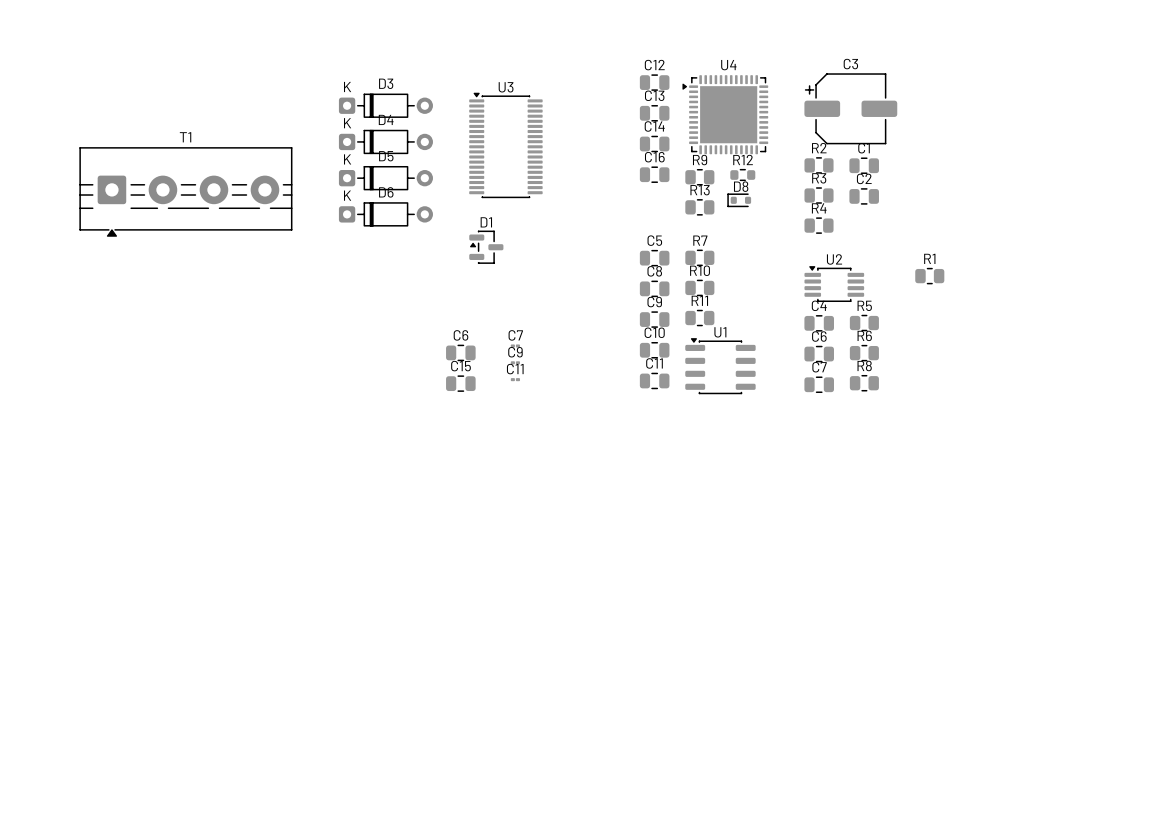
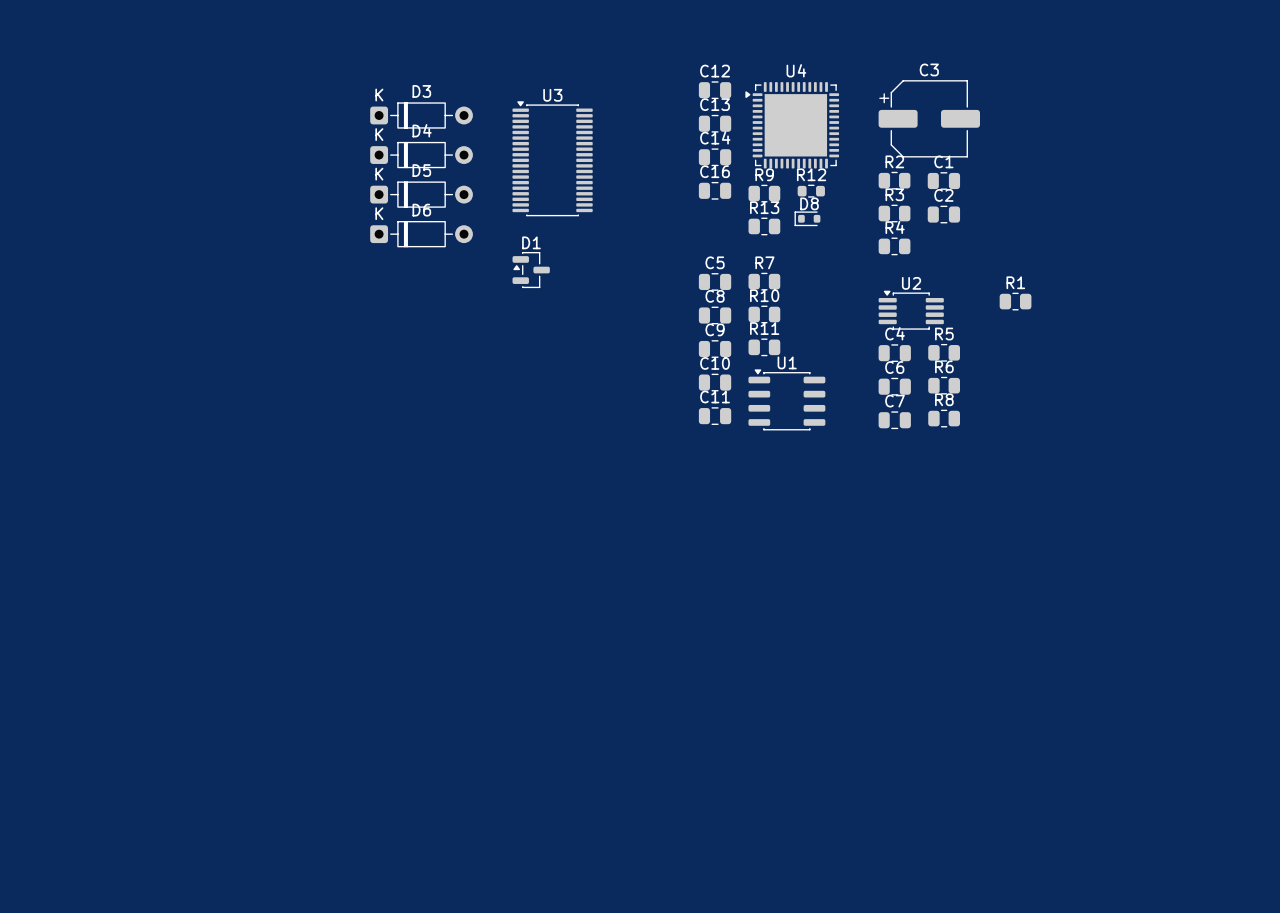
T1: (185, 191) -> none
C7: (515, 345) -> none
C6: (460, 352) -> none
C9: (515, 362) -> none
C11: (515, 379) -> none
C15: (460, 383) -> none

